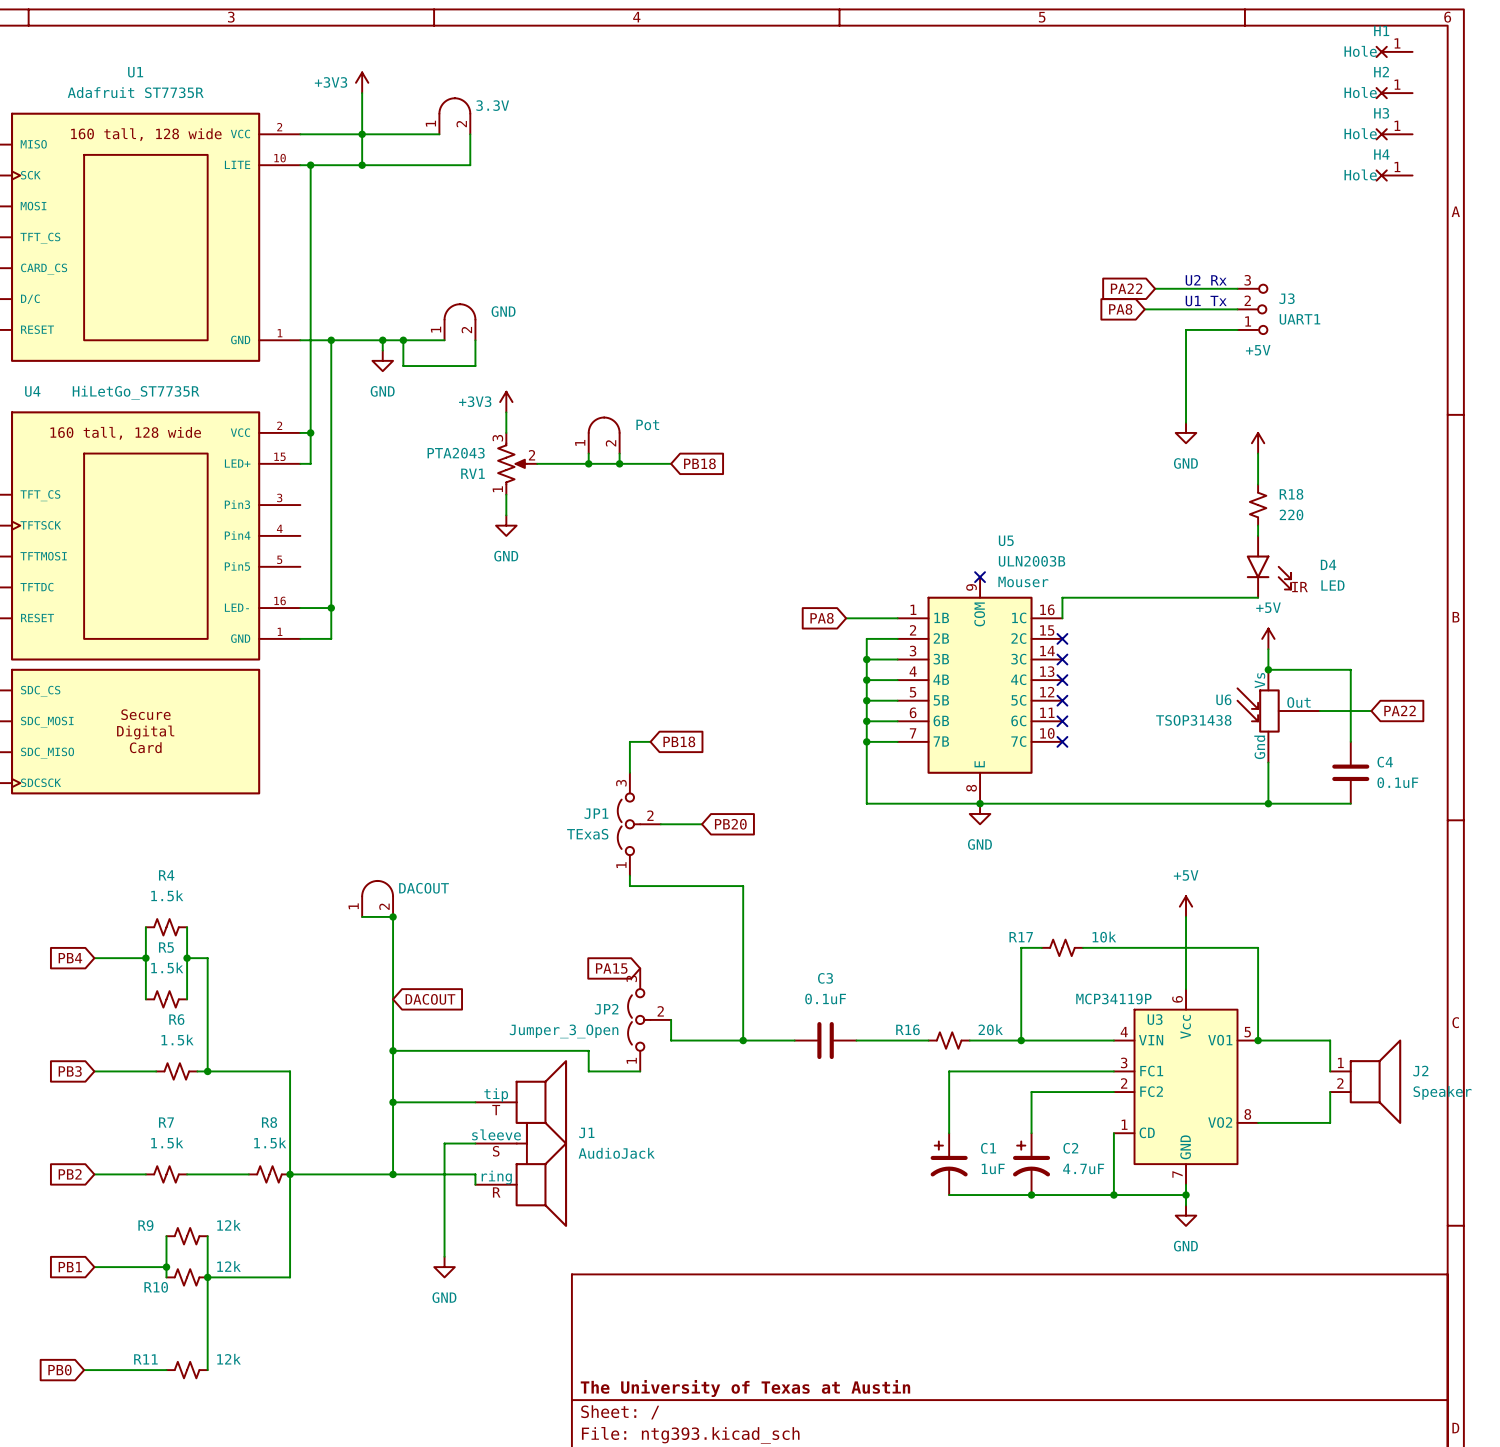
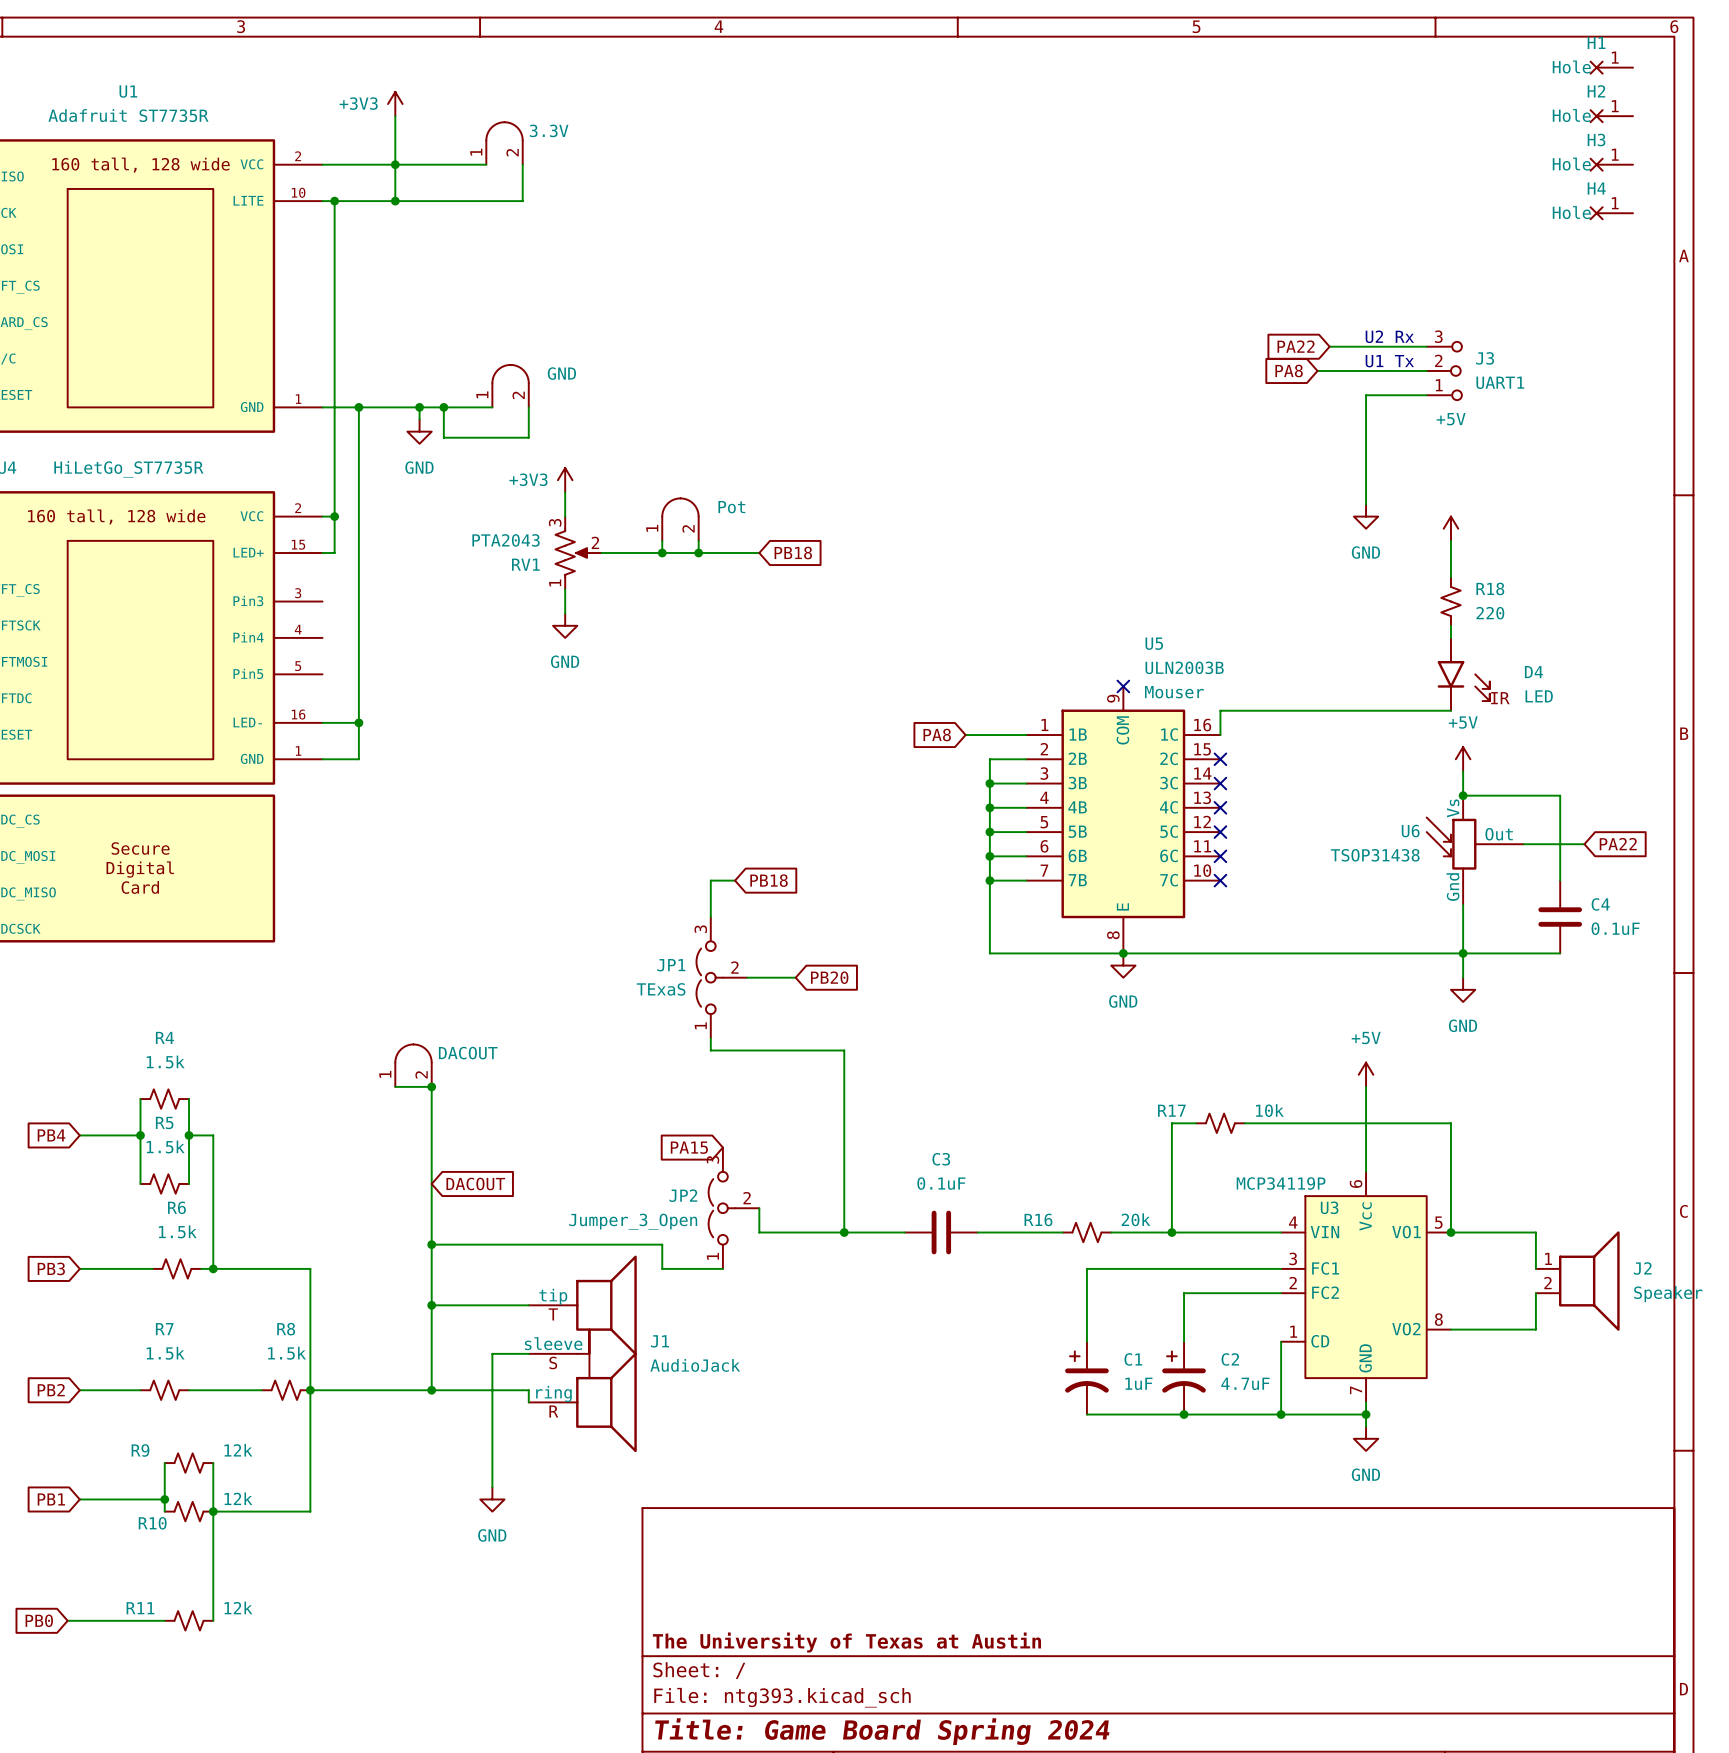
wire: none -> (1463, 953) (1463, 977)
power symbol: none -> GND (1463, 989)

